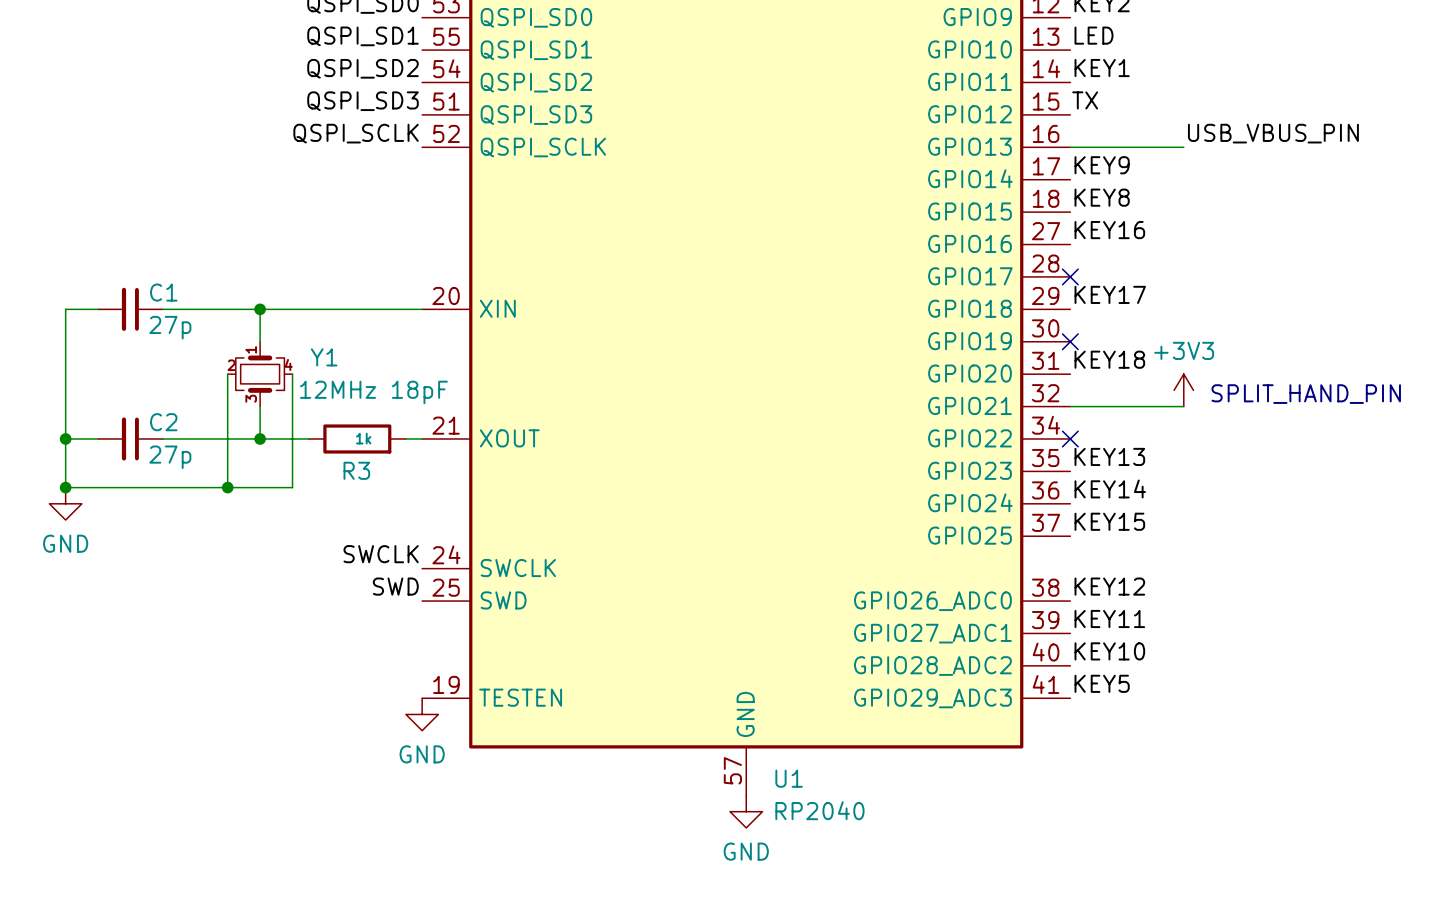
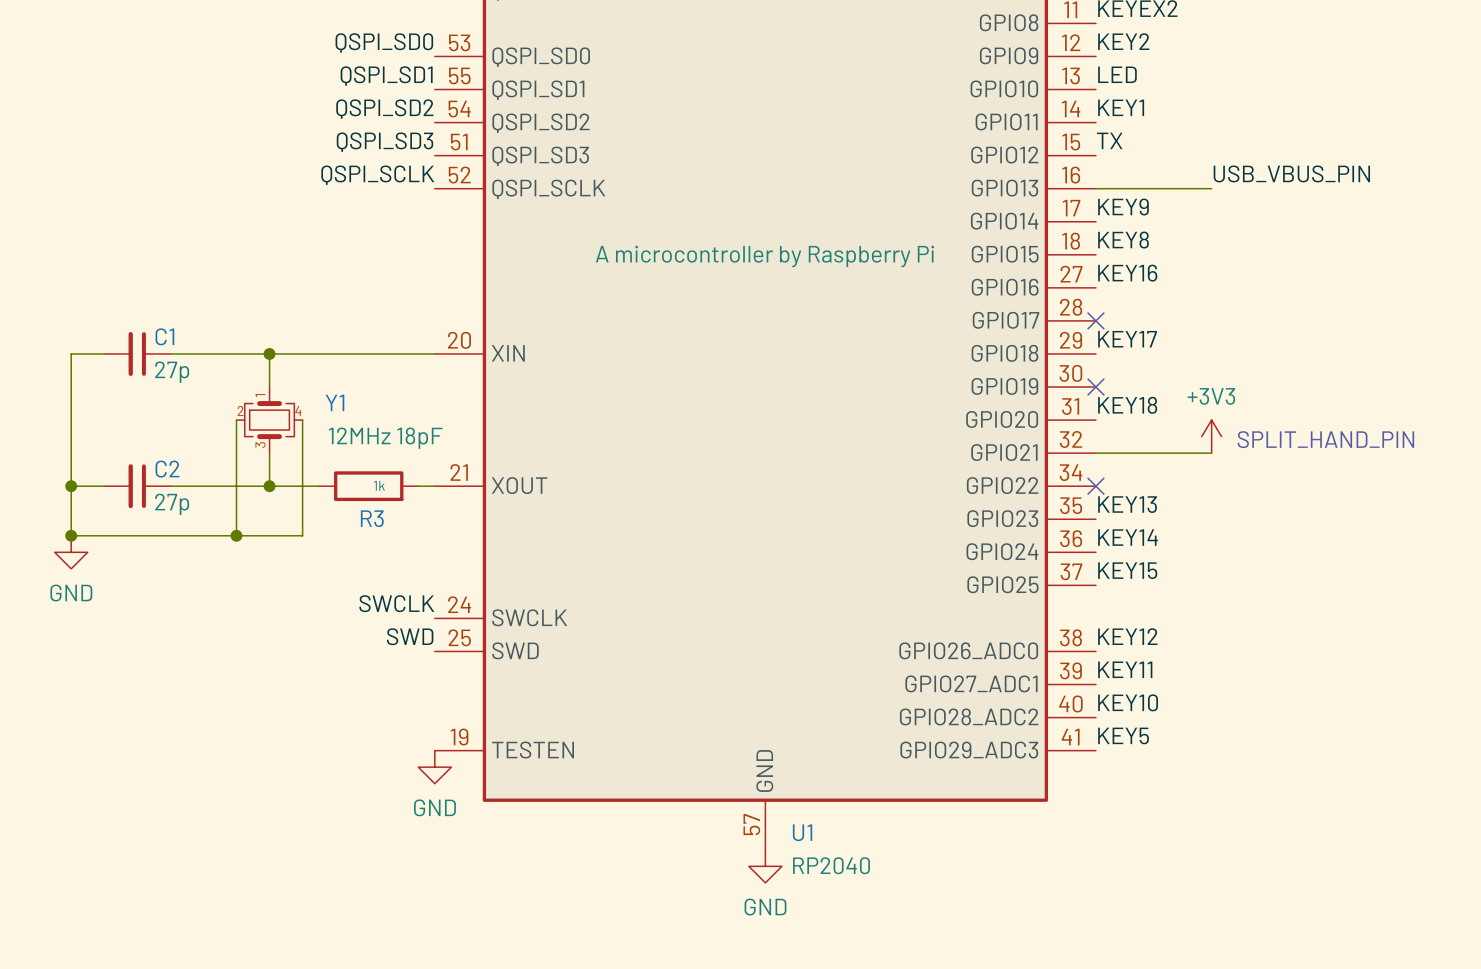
U1 text: none -> A microcontroller by Raspberry Pi (764, 256)

